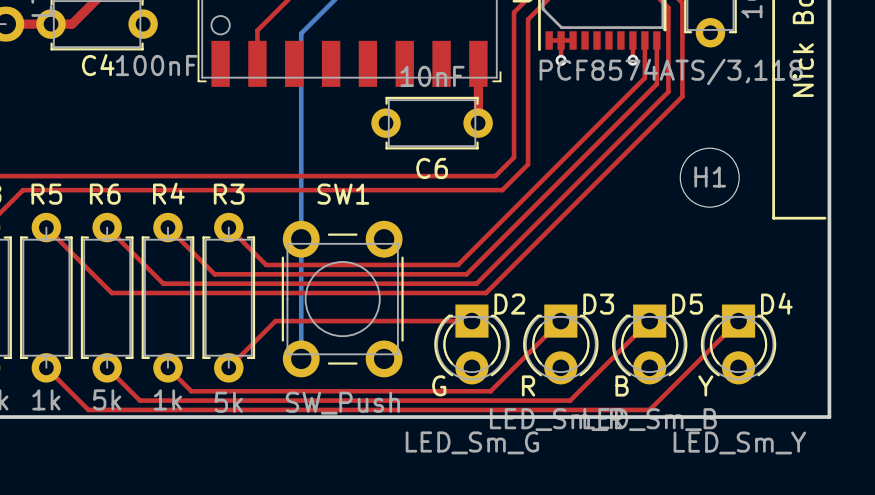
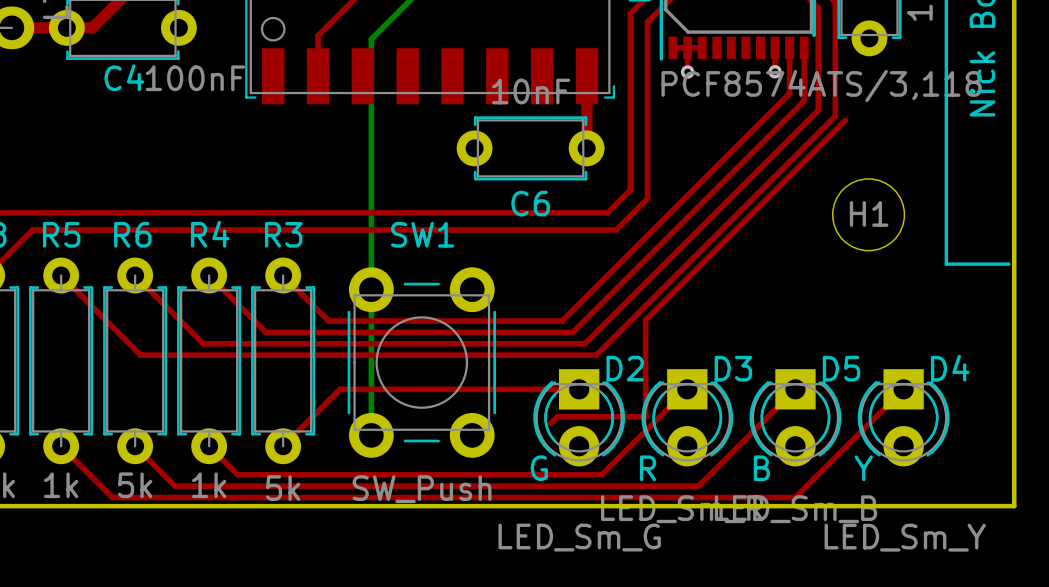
top track: none -> (845, 120) (645, 320) (645, 416) (557, 416) (550, 423)

